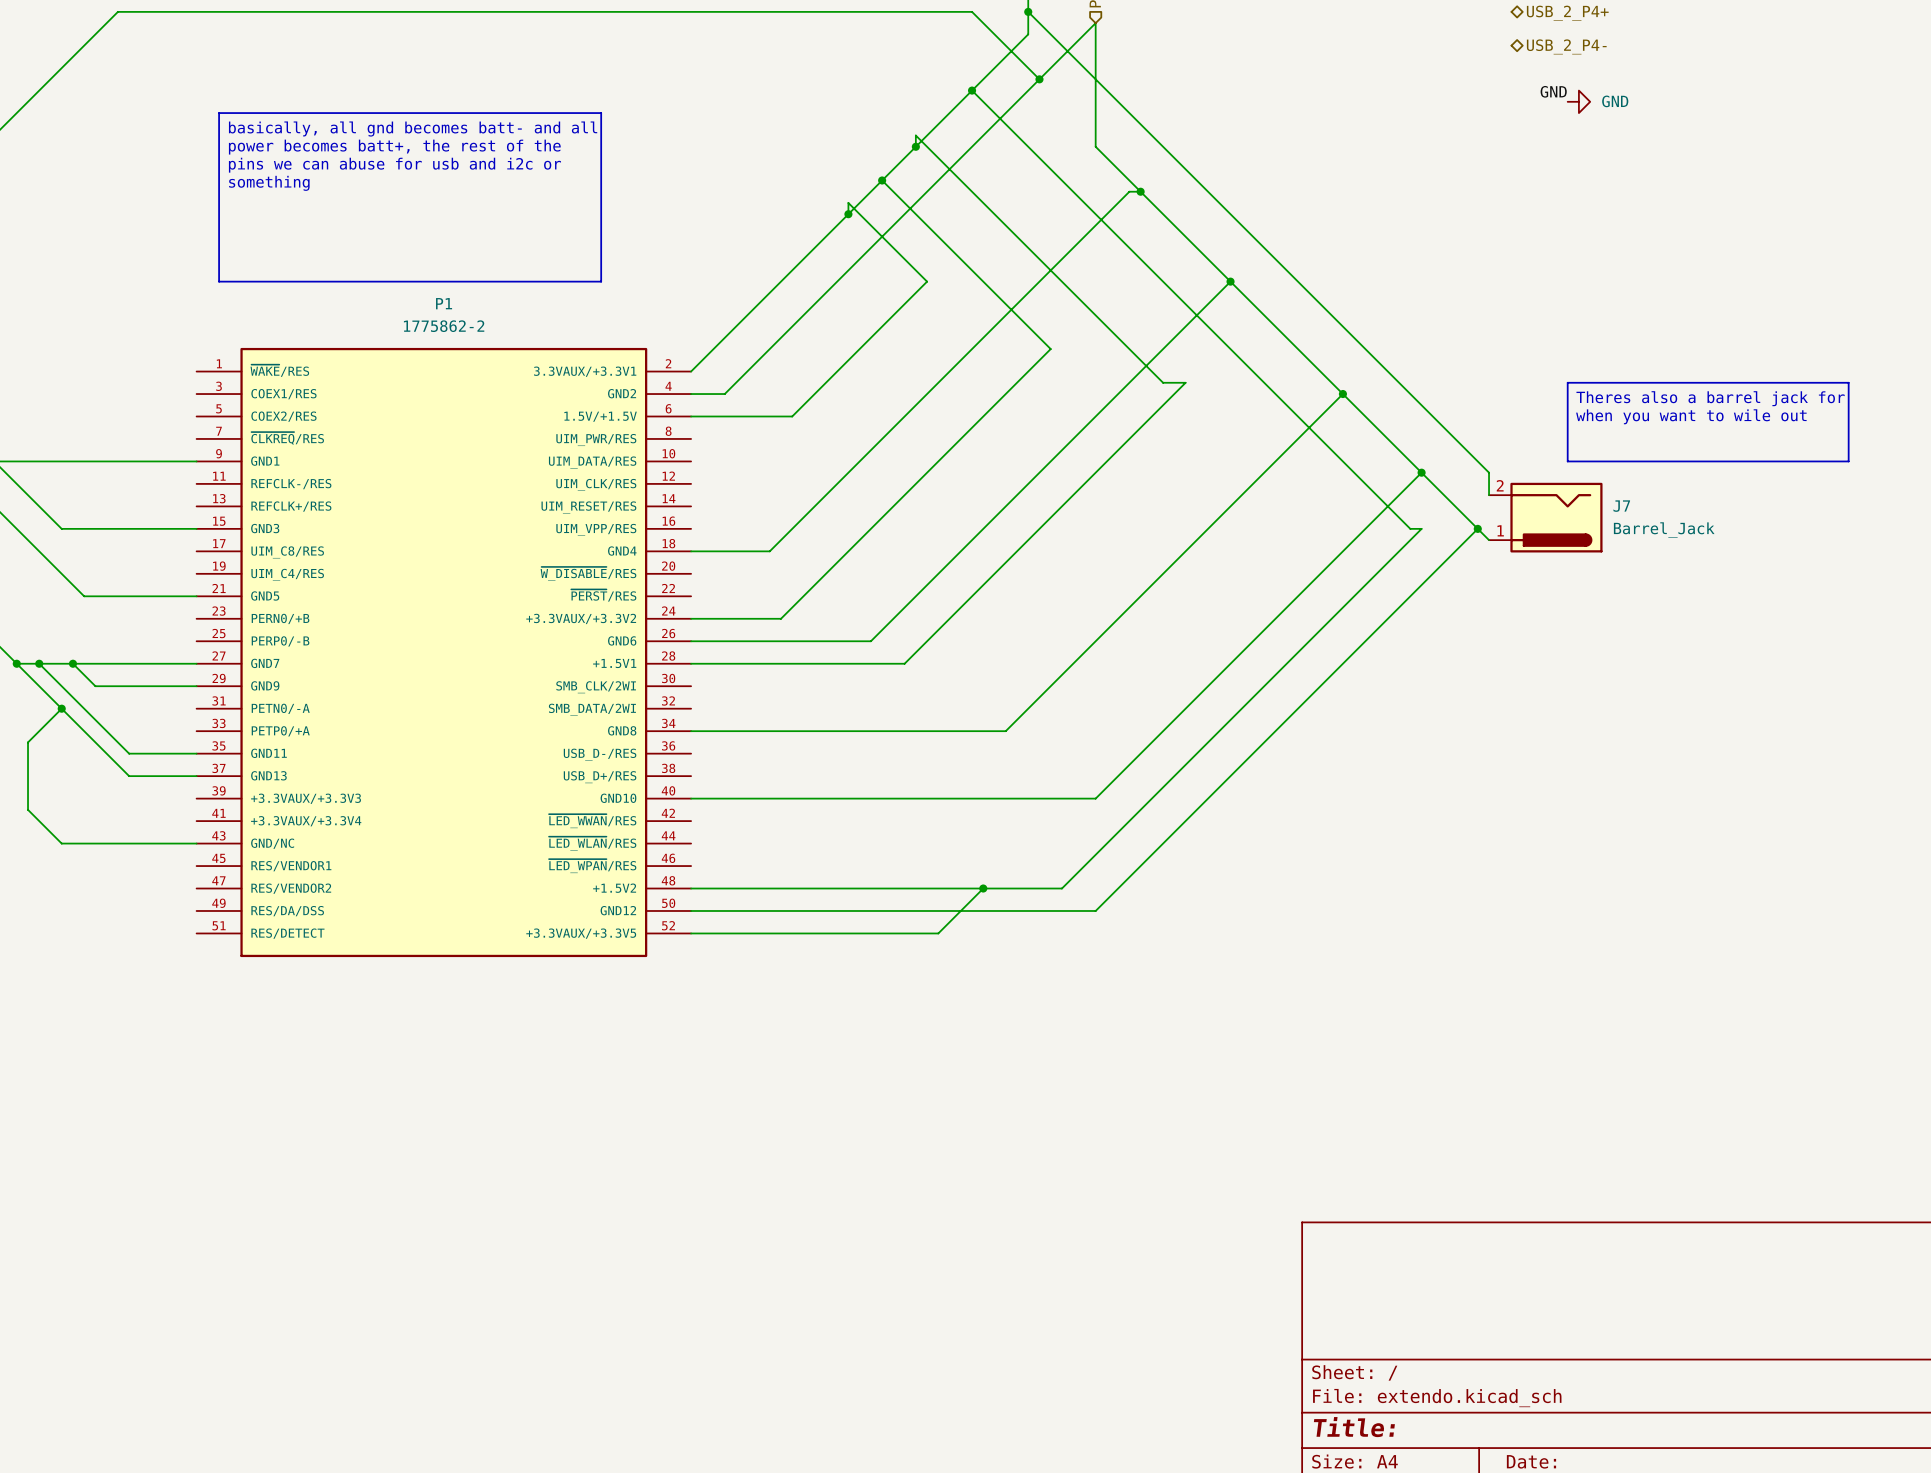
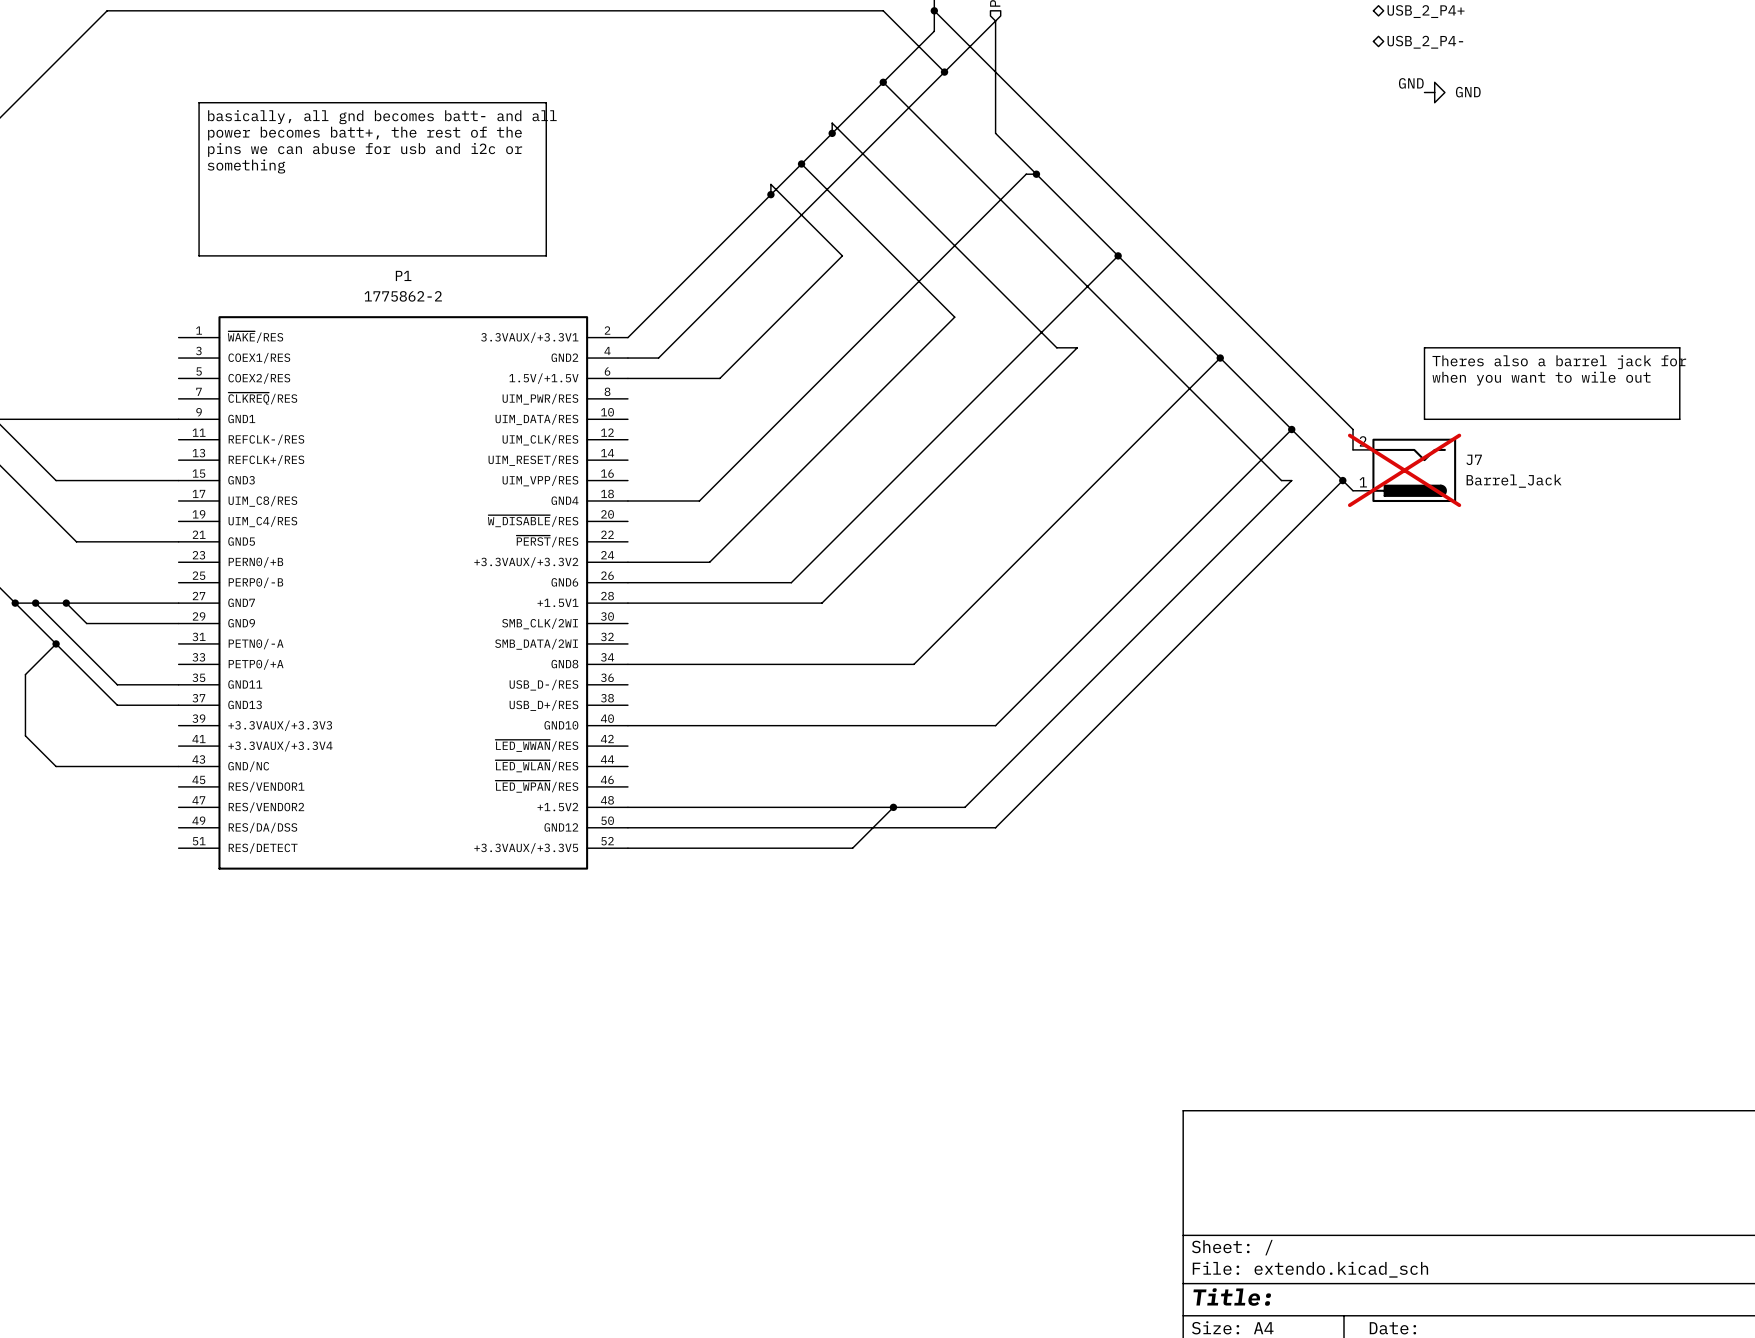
J7 do-not-place cross: none -> (1404, 470)

